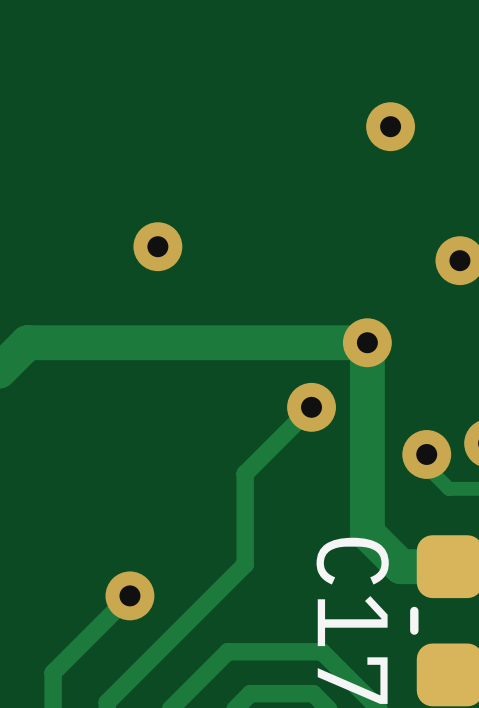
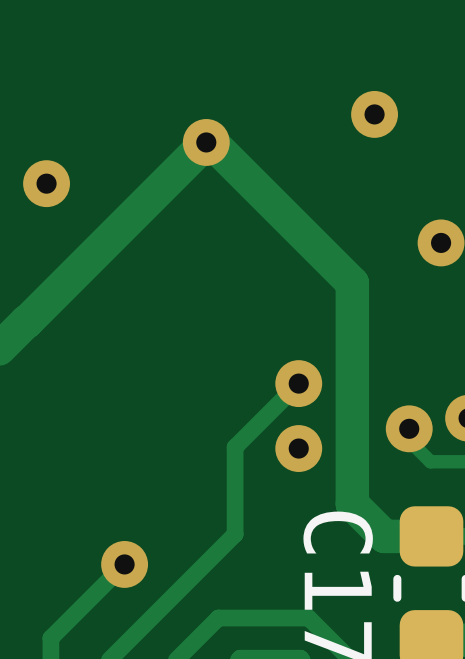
via: none -> (206, 142)
via: none -> (46, 183)
via: (157, 246) -> none
track: (367, 342) (28, 342) -> (352, 321) (352, 283) (211, 142) (206, 142) (27, 321)
via: (367, 342) -> none
via: none -> (298, 448)

